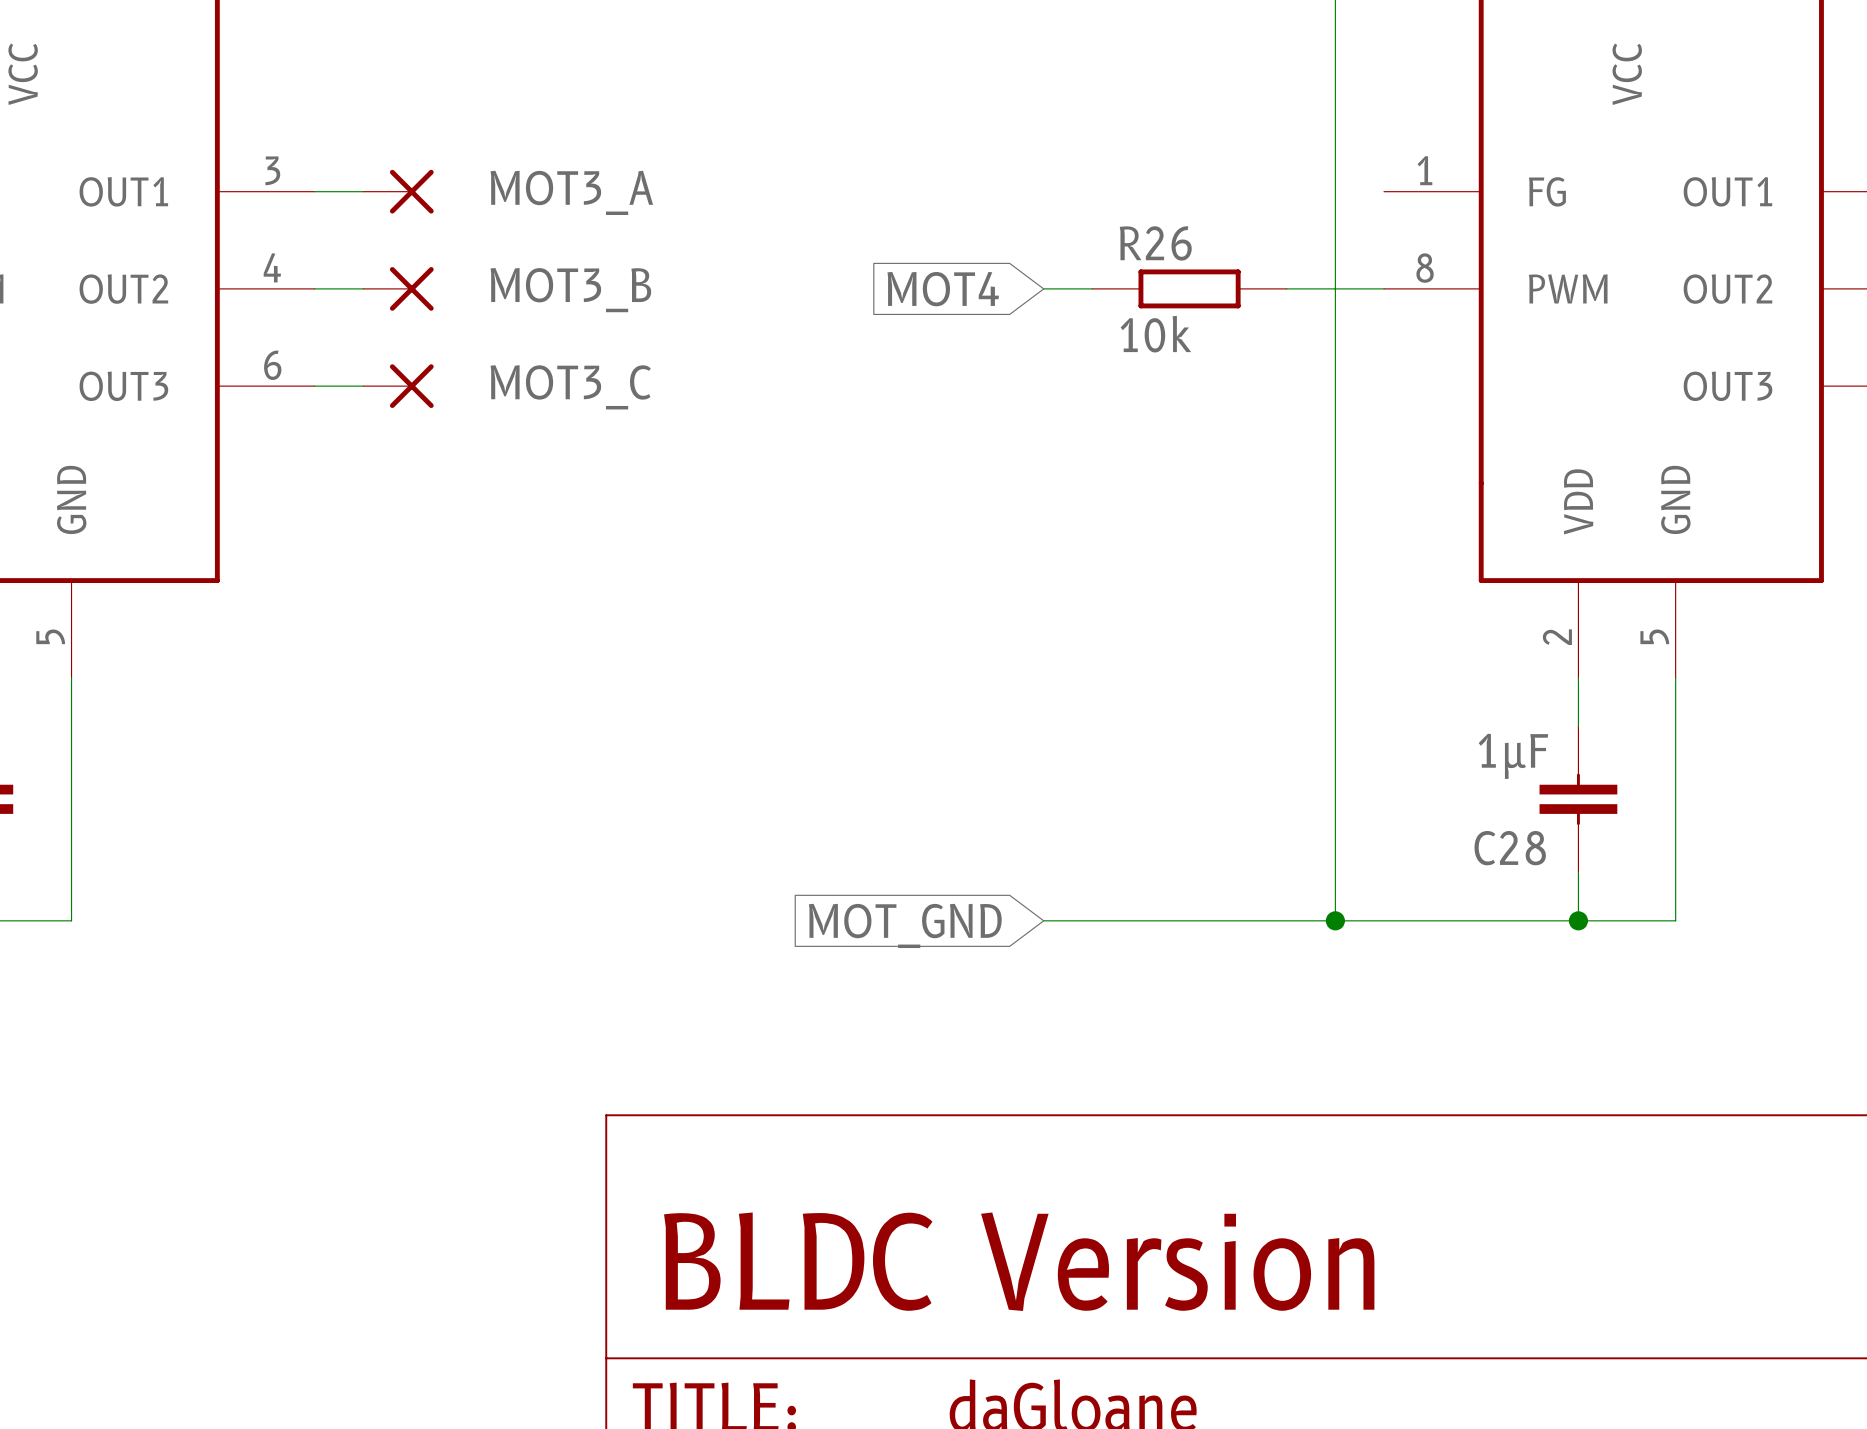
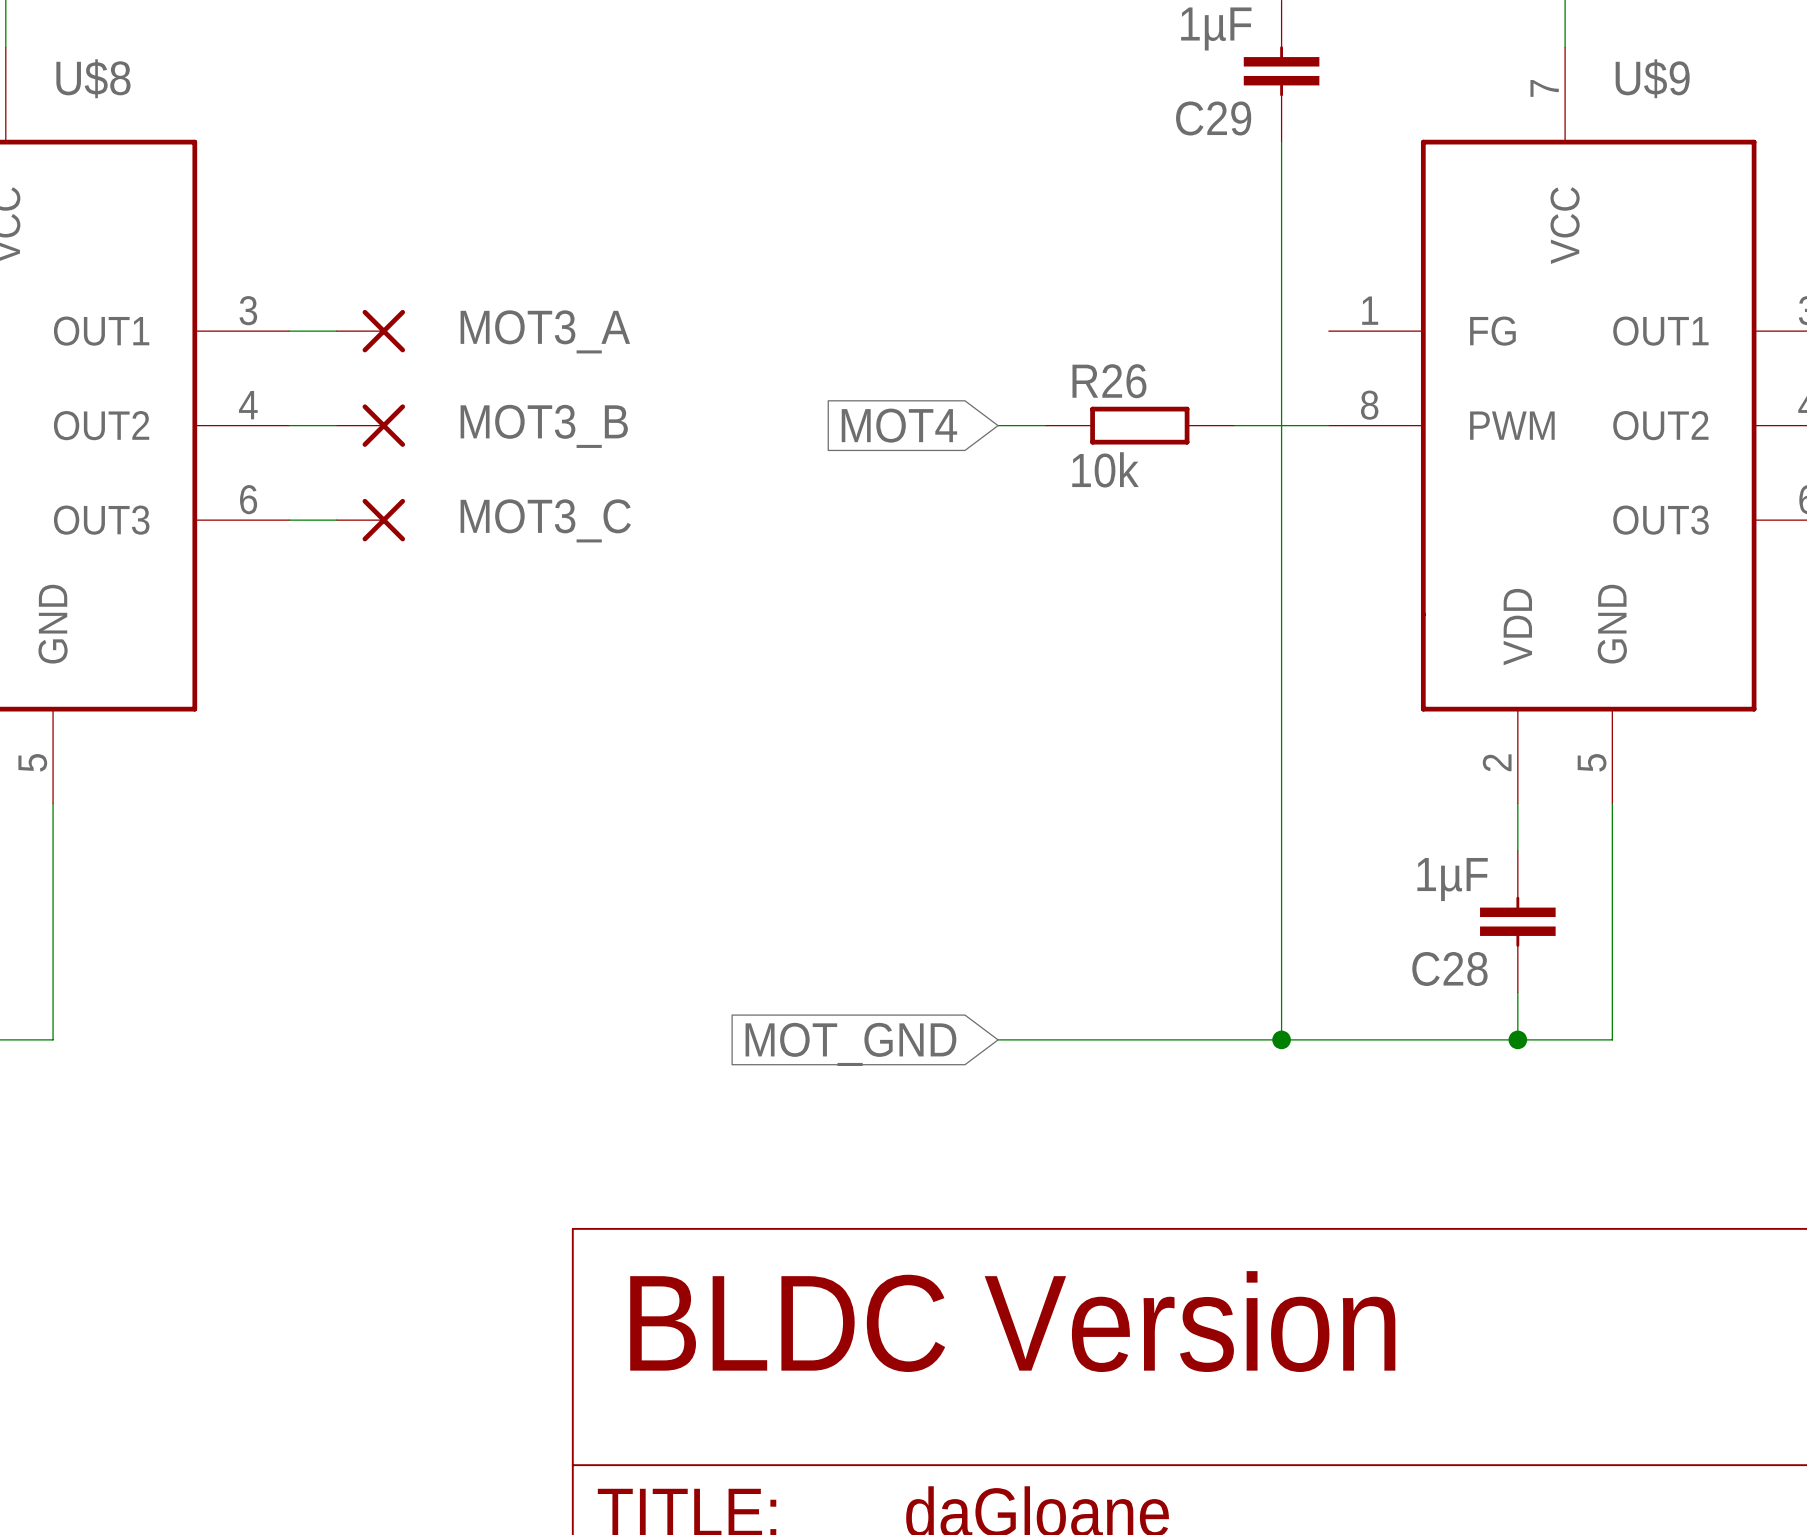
text position: BLDC Version (1019, 1261) -> BLDC Version (1012, 1321)

